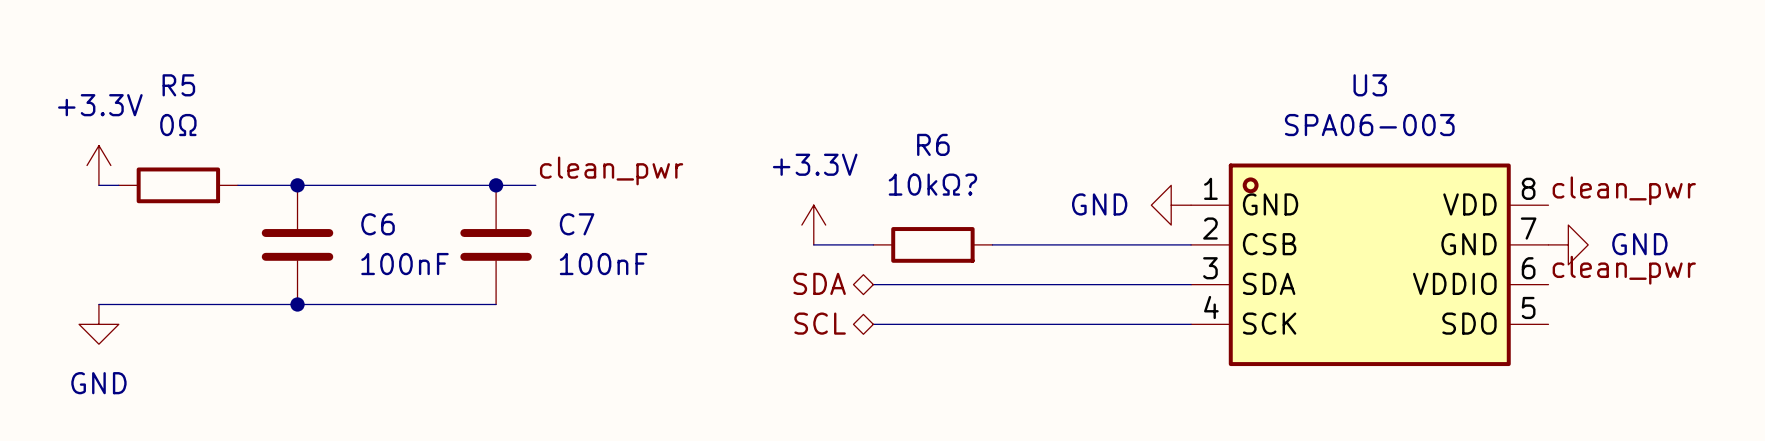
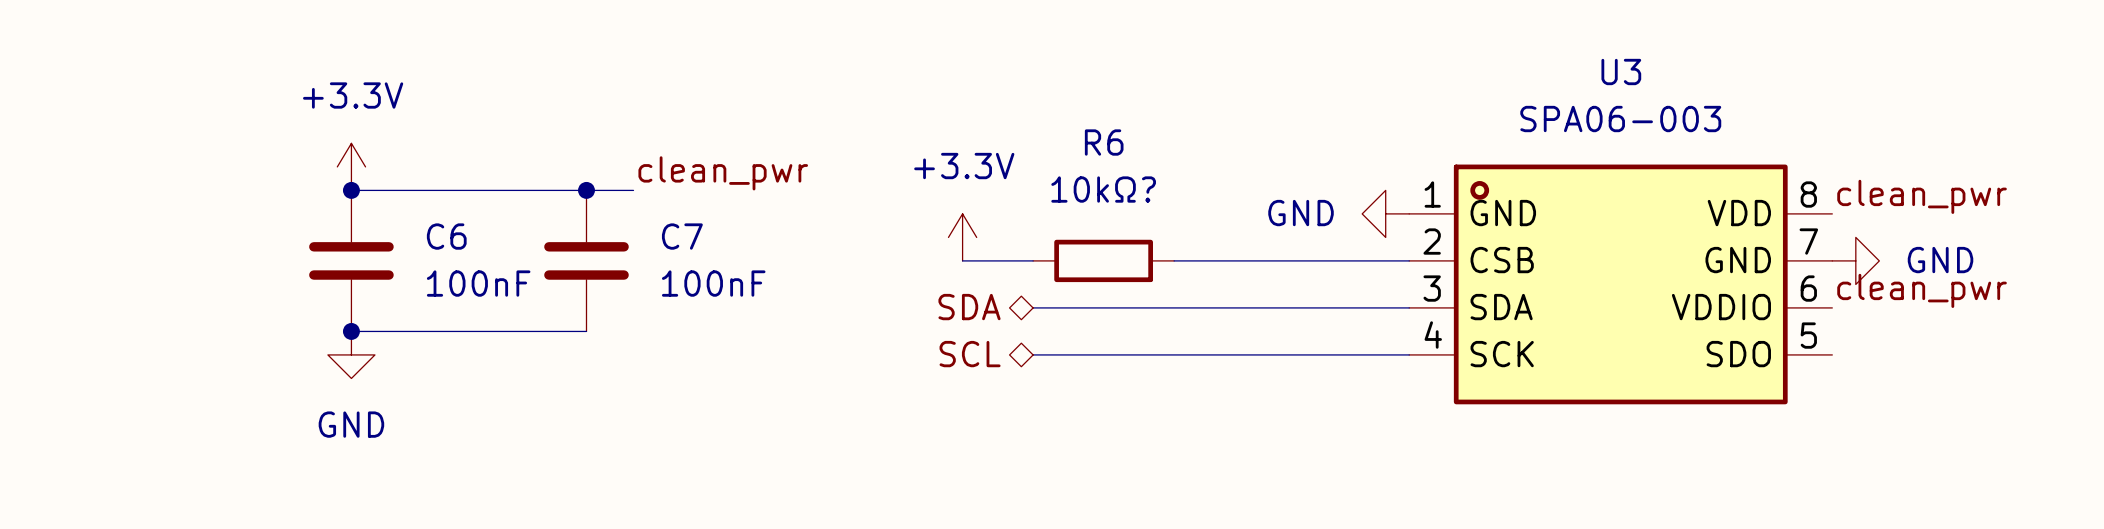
power symbol position: +3.3V (98, 165) -> +3.3V (351, 166)
wire: (98, 185) (118, 185) -> none
R5: 0Ω (178, 185) -> none
wire: (237, 185) (297, 185) -> none
wire: (98, 304) (297, 304) -> none
power symbol position: GND (98, 324) -> GND (351, 354)

